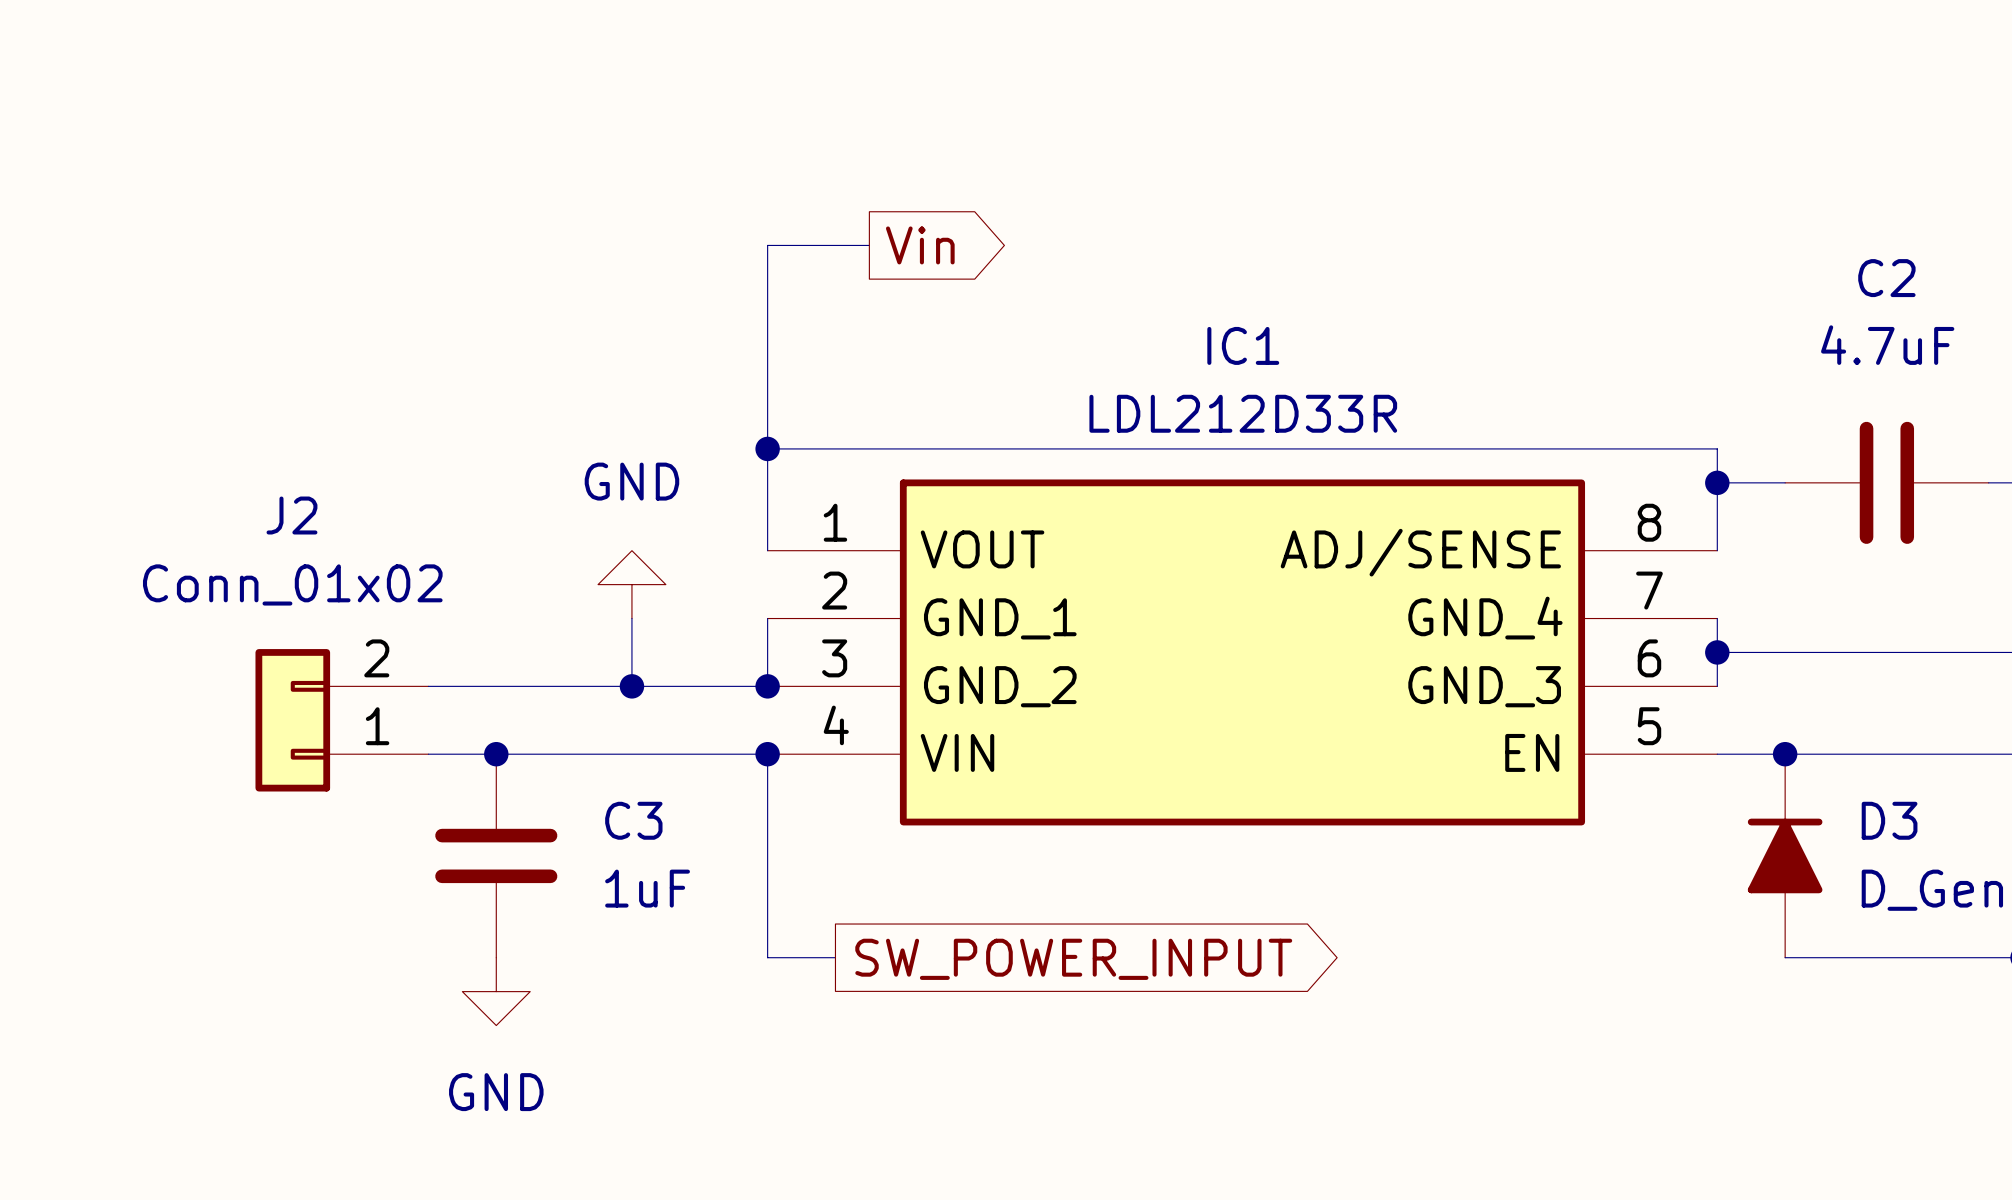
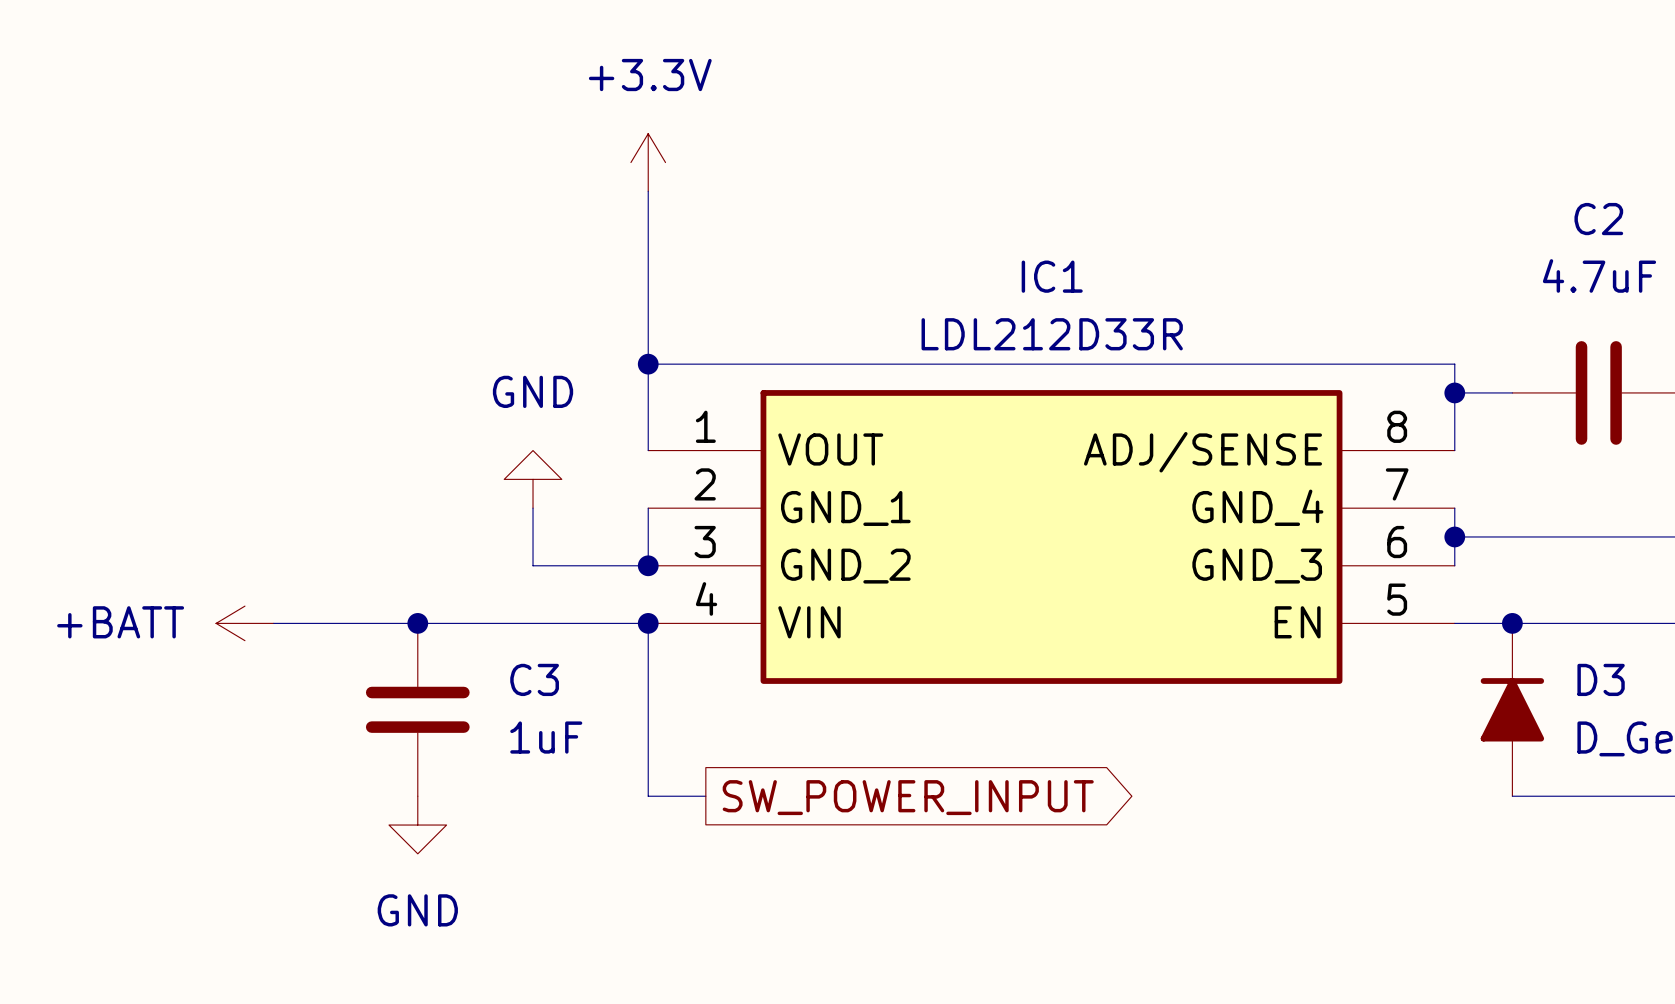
power symbol: none -> +3.3V (648, 162)
wire: (767, 245) (869, 245) -> none
global label: Vin (920, 245) -> none
wire: (428, 686) (631, 686) -> none
junction: (631, 686) -> none
J2: Conn_01x02 (341, 720) -> none
power symbol: none -> +BATT (244, 623)

